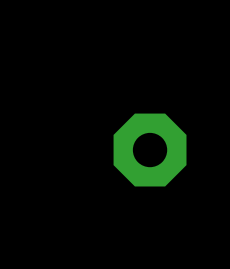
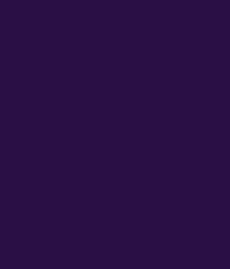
part: (150, 150) -> none

